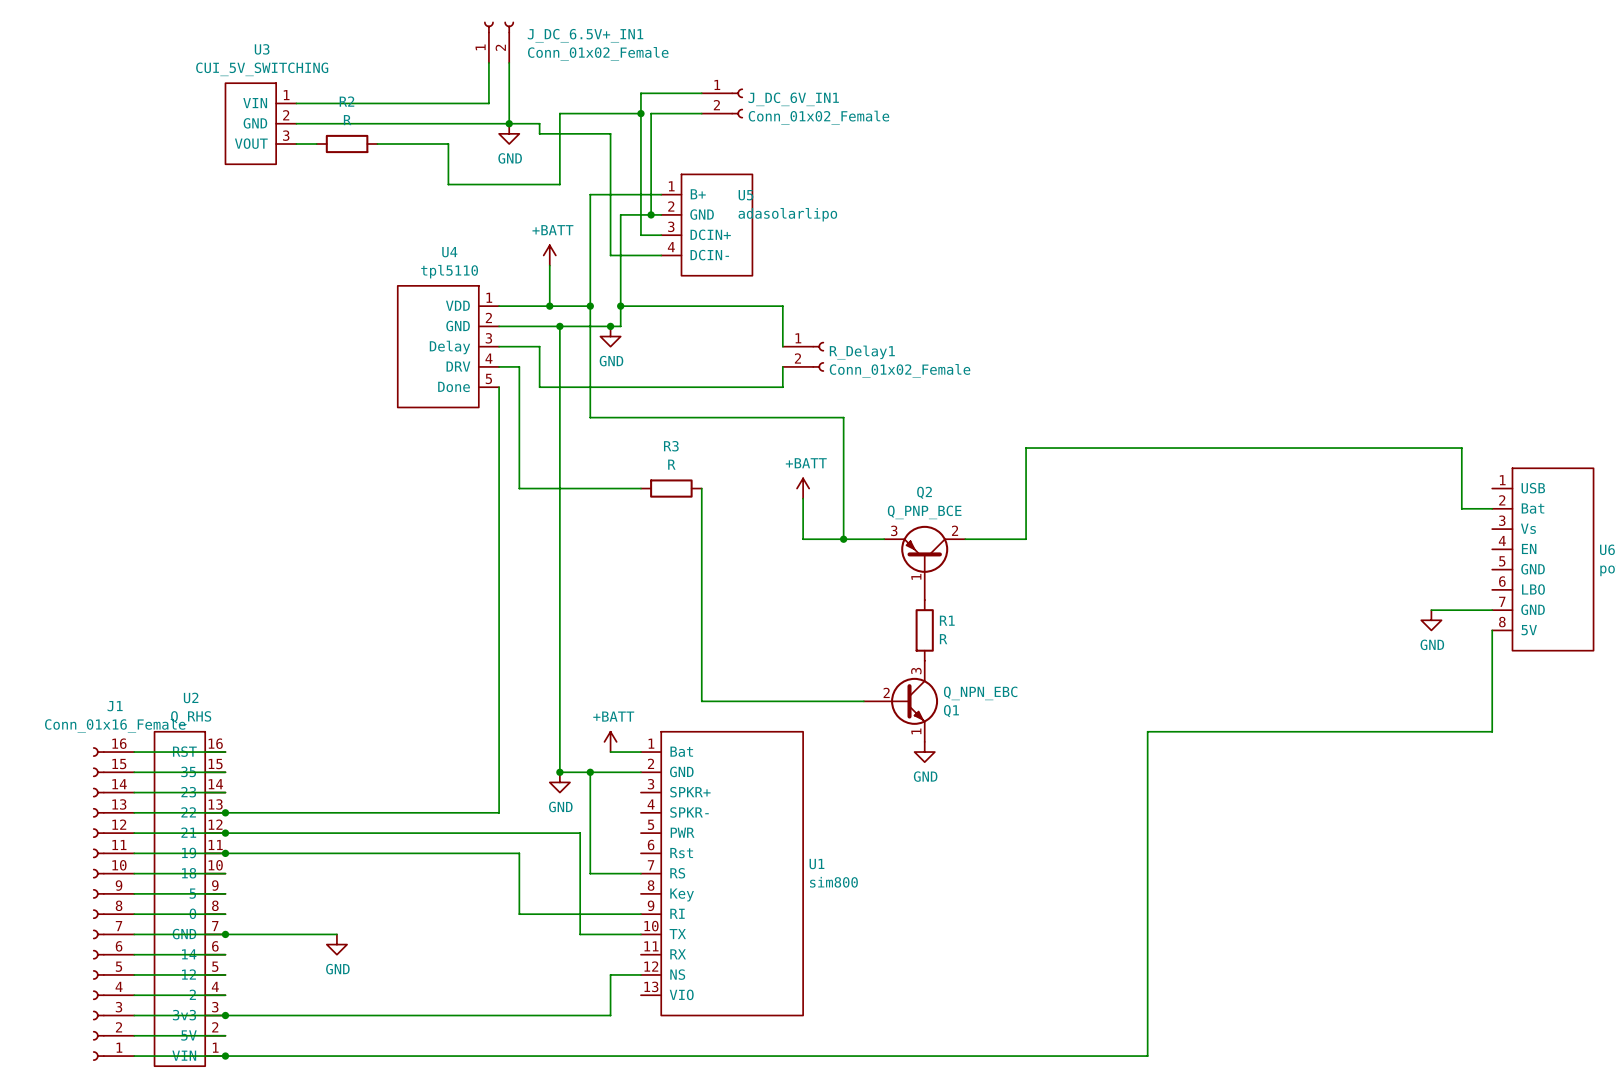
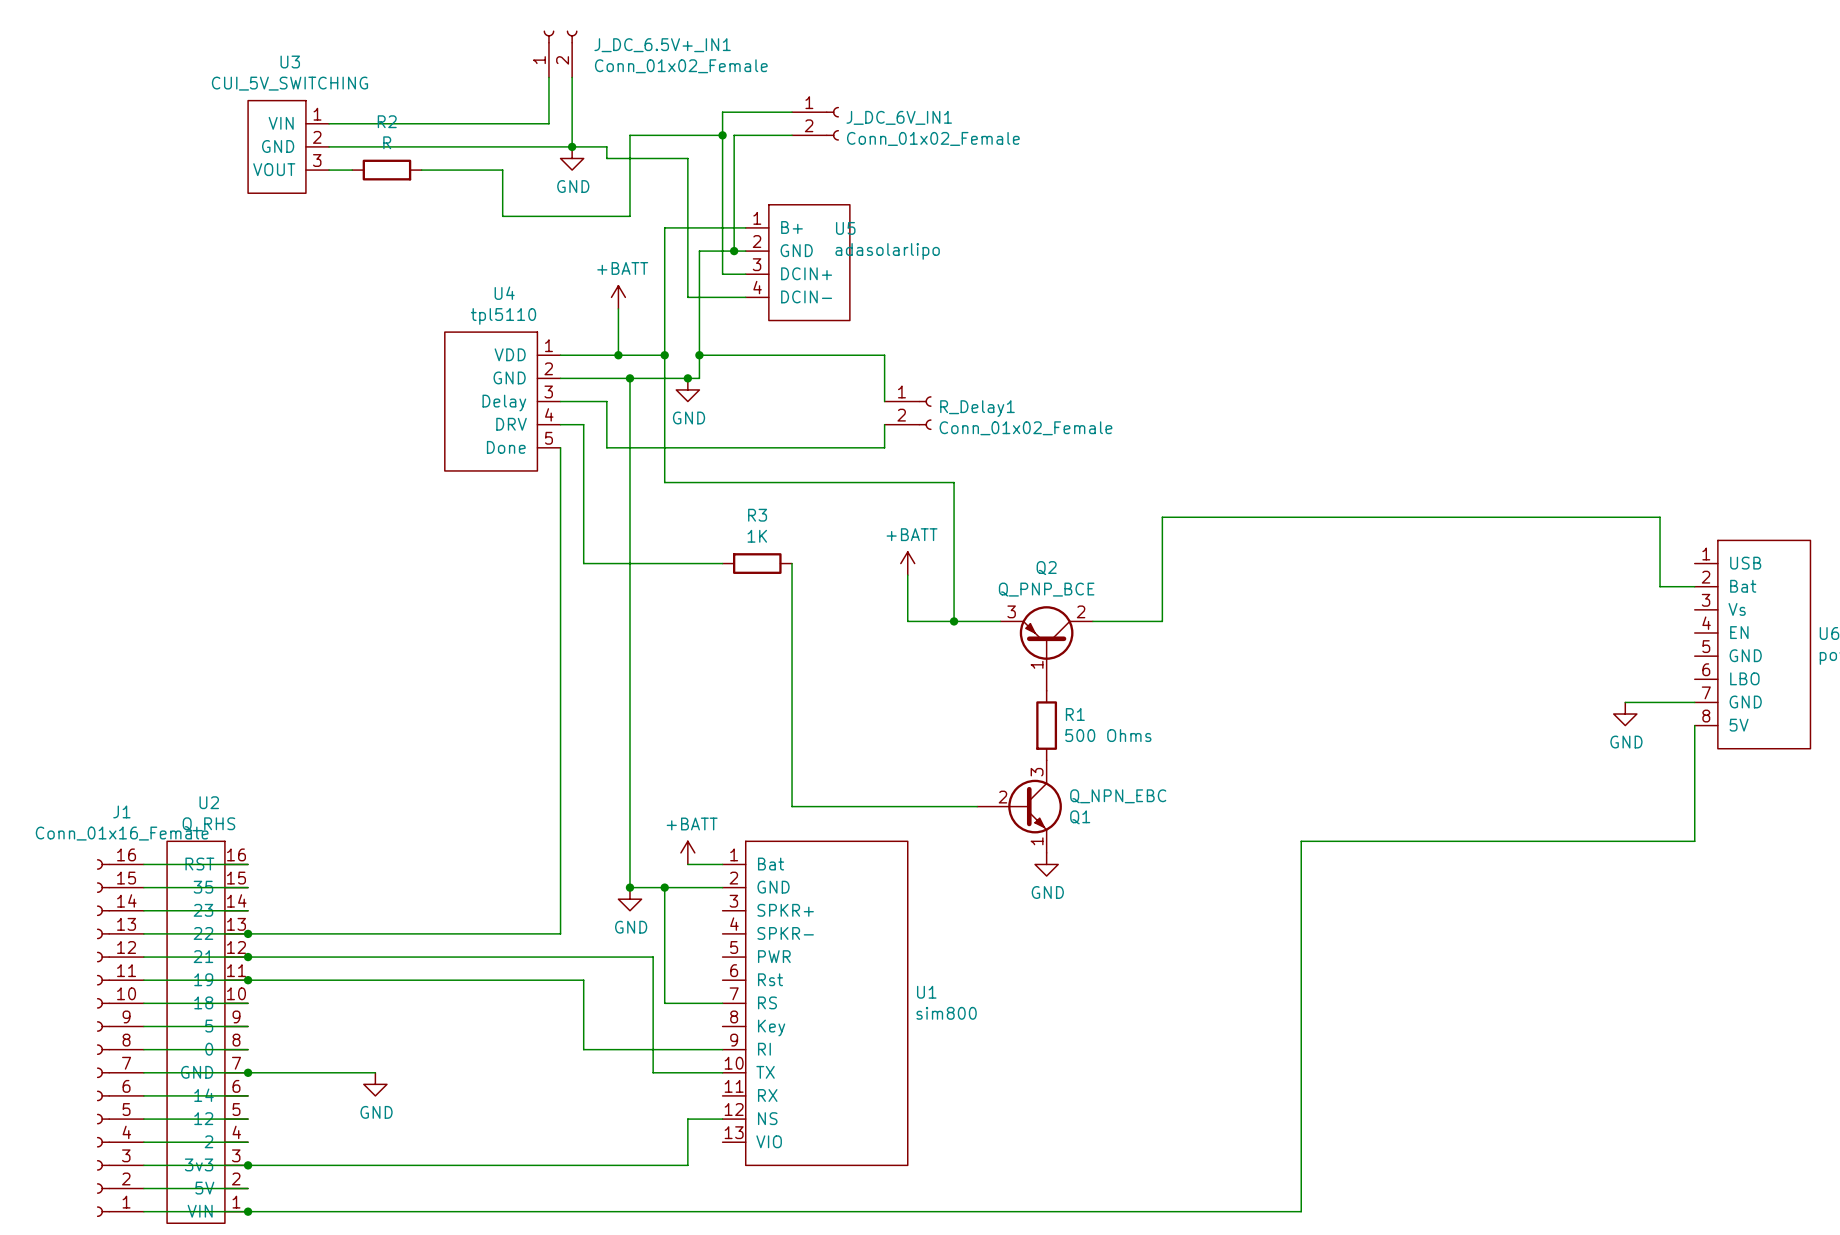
R3 value: R (671, 464) -> 1K (757, 536)
R1 value: R (943, 639) -> 500 Ohms (1108, 735)

